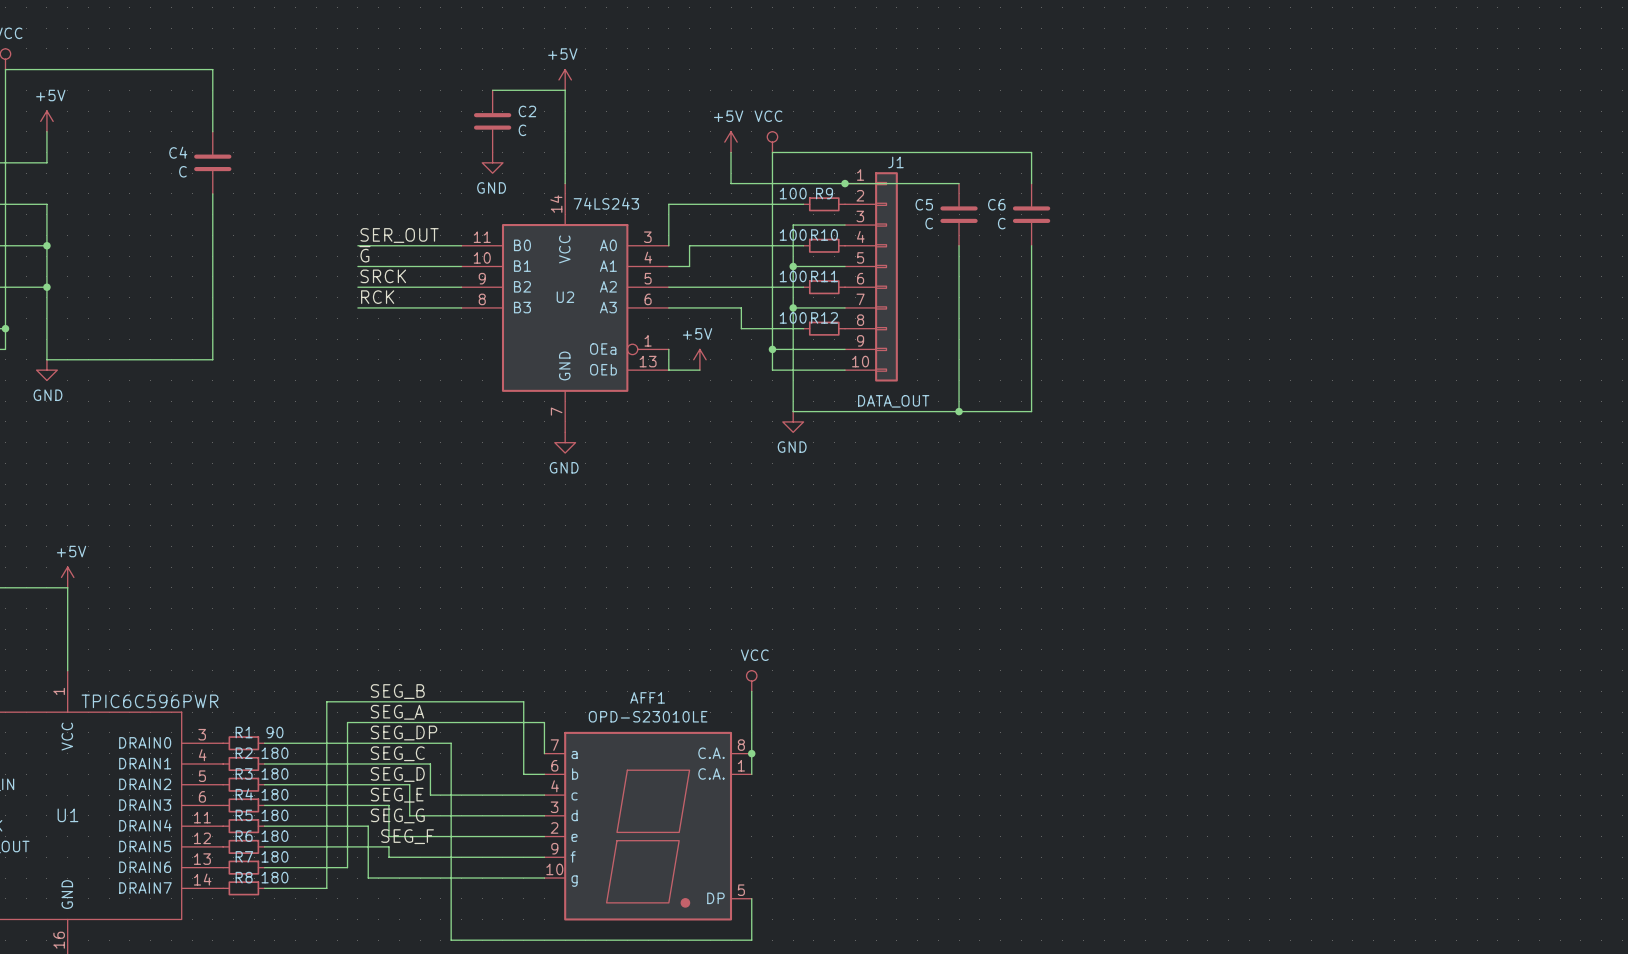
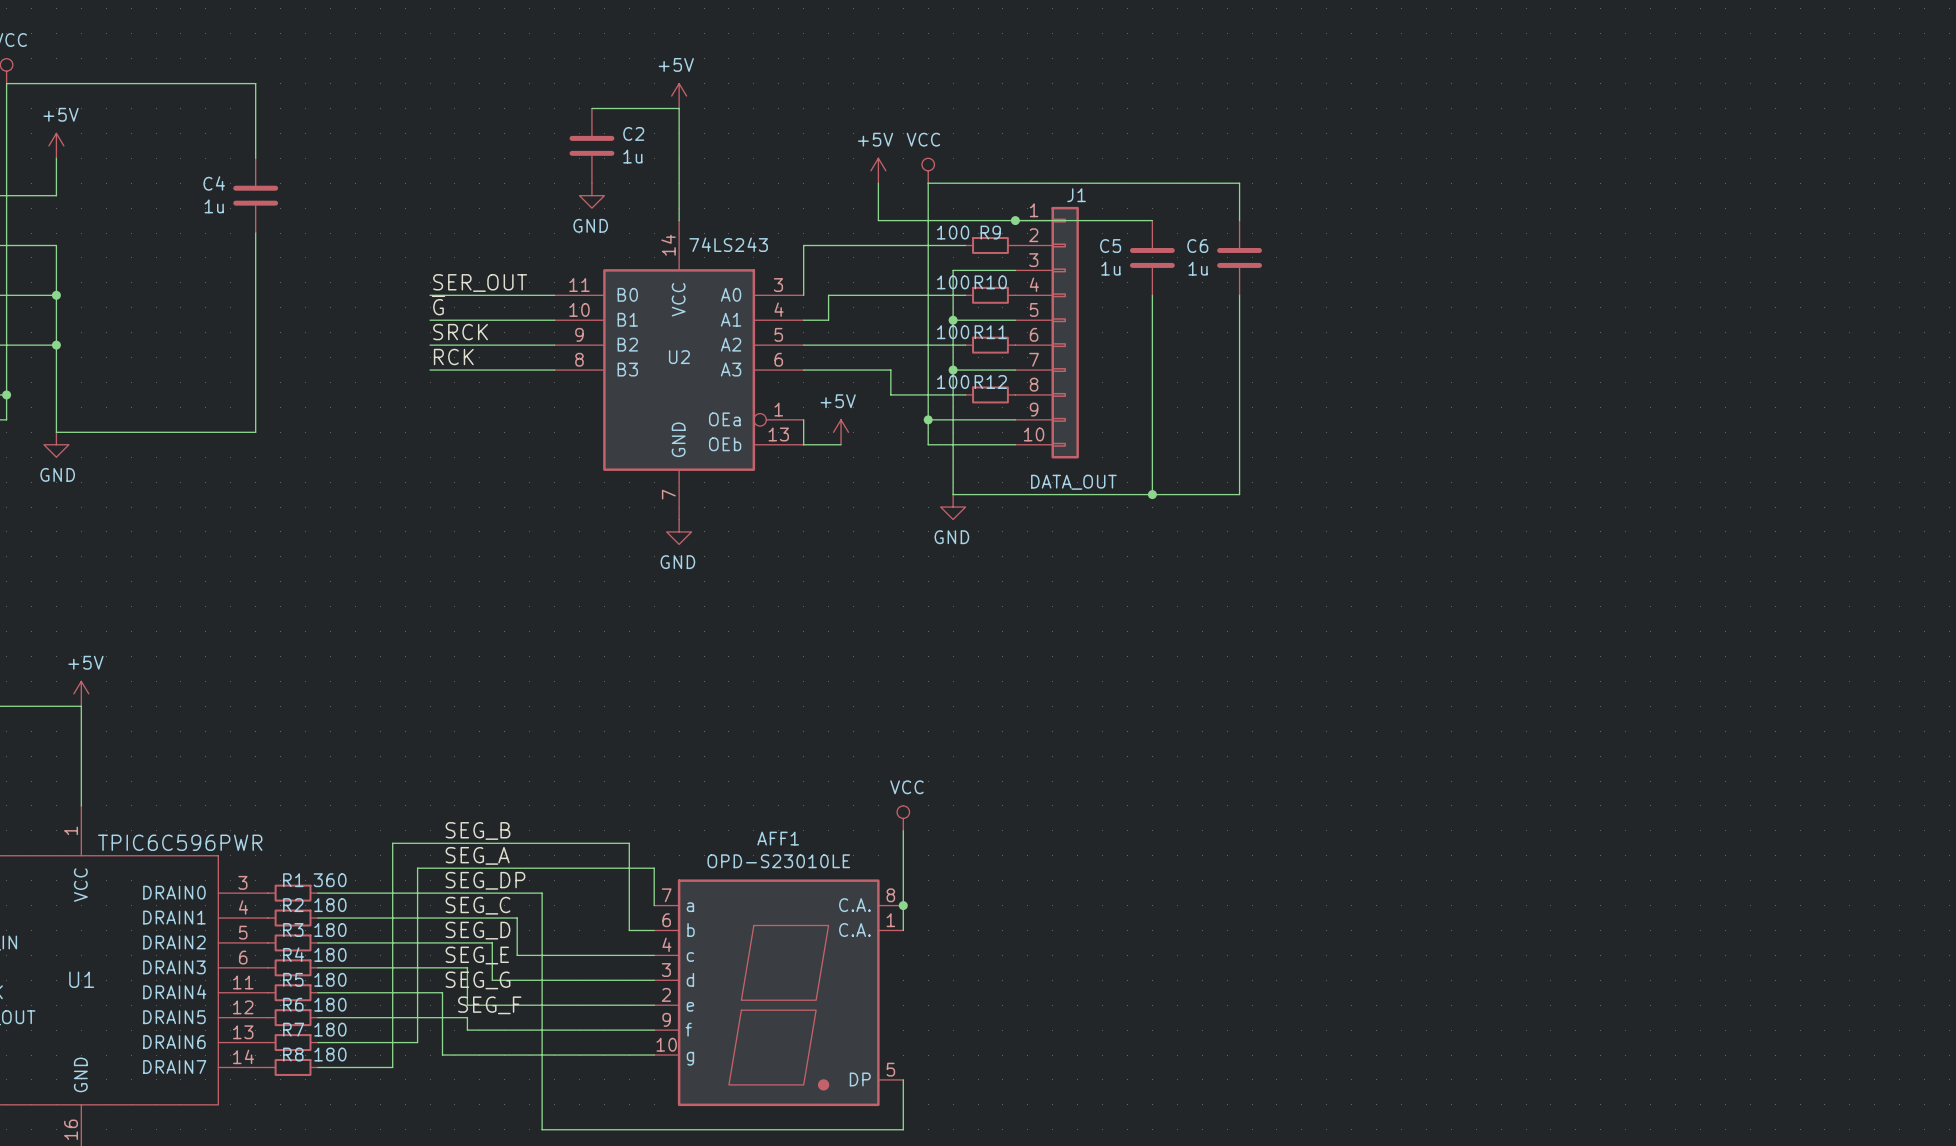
C2 value: C (522, 130) -> 1u (632, 156)
C4 value: C (182, 171) -> 1u (214, 206)
C5 value: C (929, 223) -> 1u (1110, 268)
C6 value: C (1001, 223) -> 1u (1198, 268)
R1 value: 90 (274, 732) -> 360 (330, 880)

